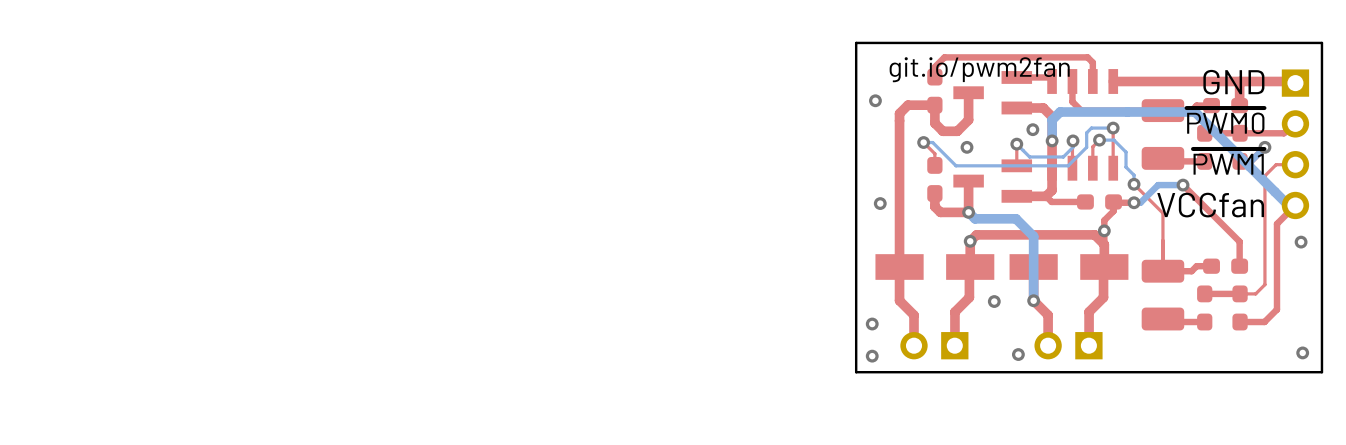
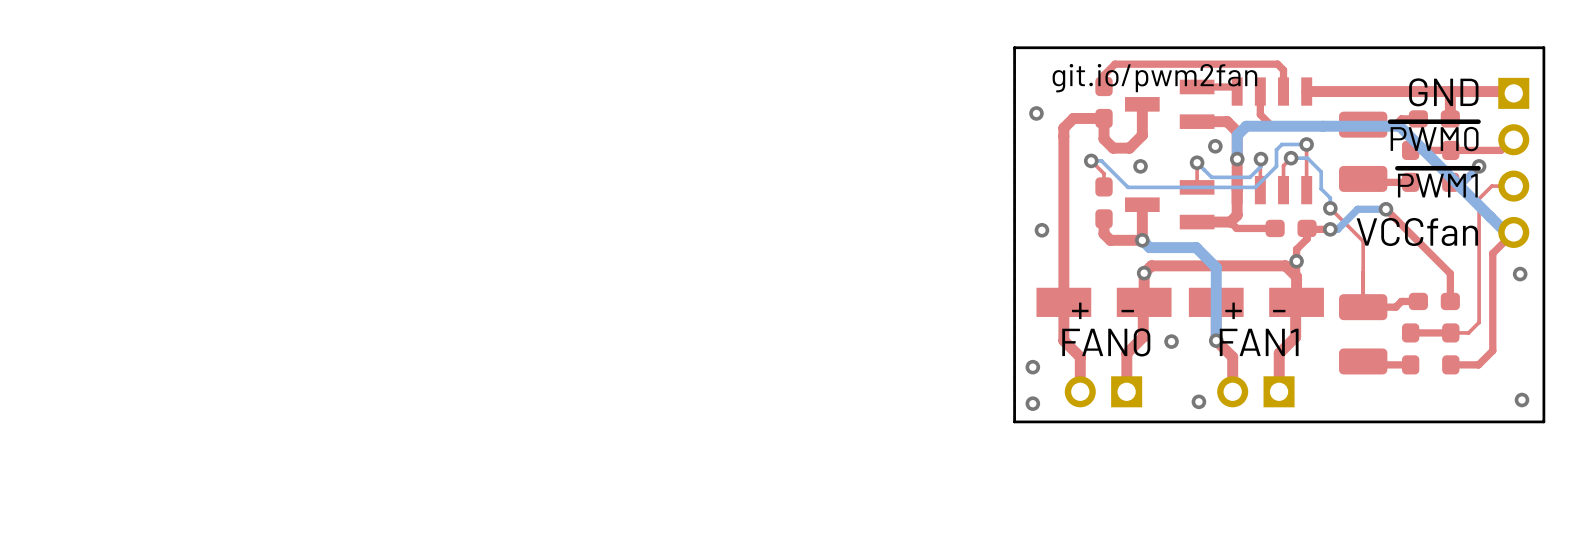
text: none -> + (1080, 310)
text: none -> - (1127, 311)
text: none -> + (1233, 310)
text: none -> - (1279, 311)
text: none -> FAN0 (1106, 342)
text: none -> FAN1 (1259, 342)

